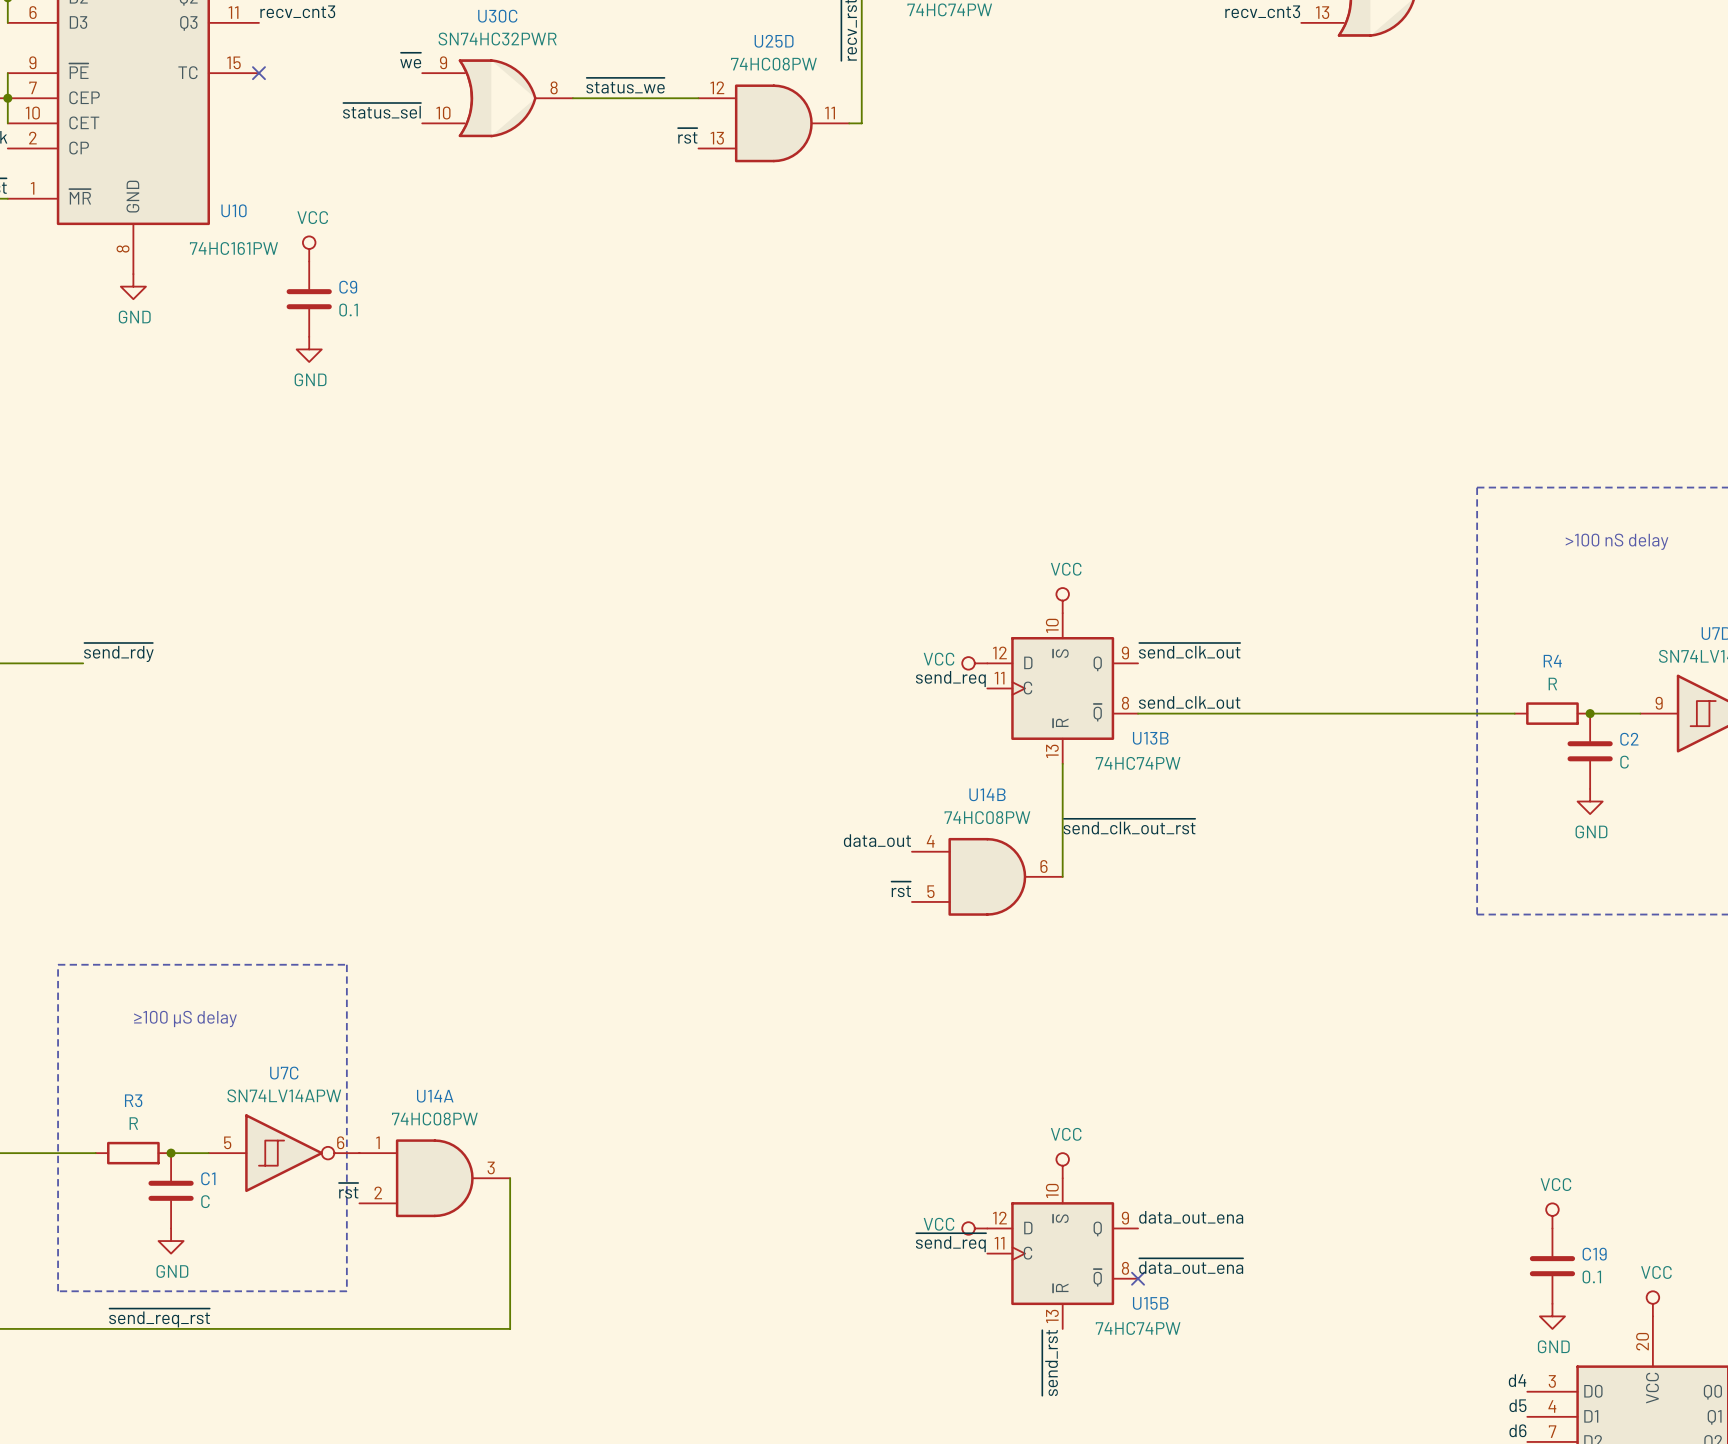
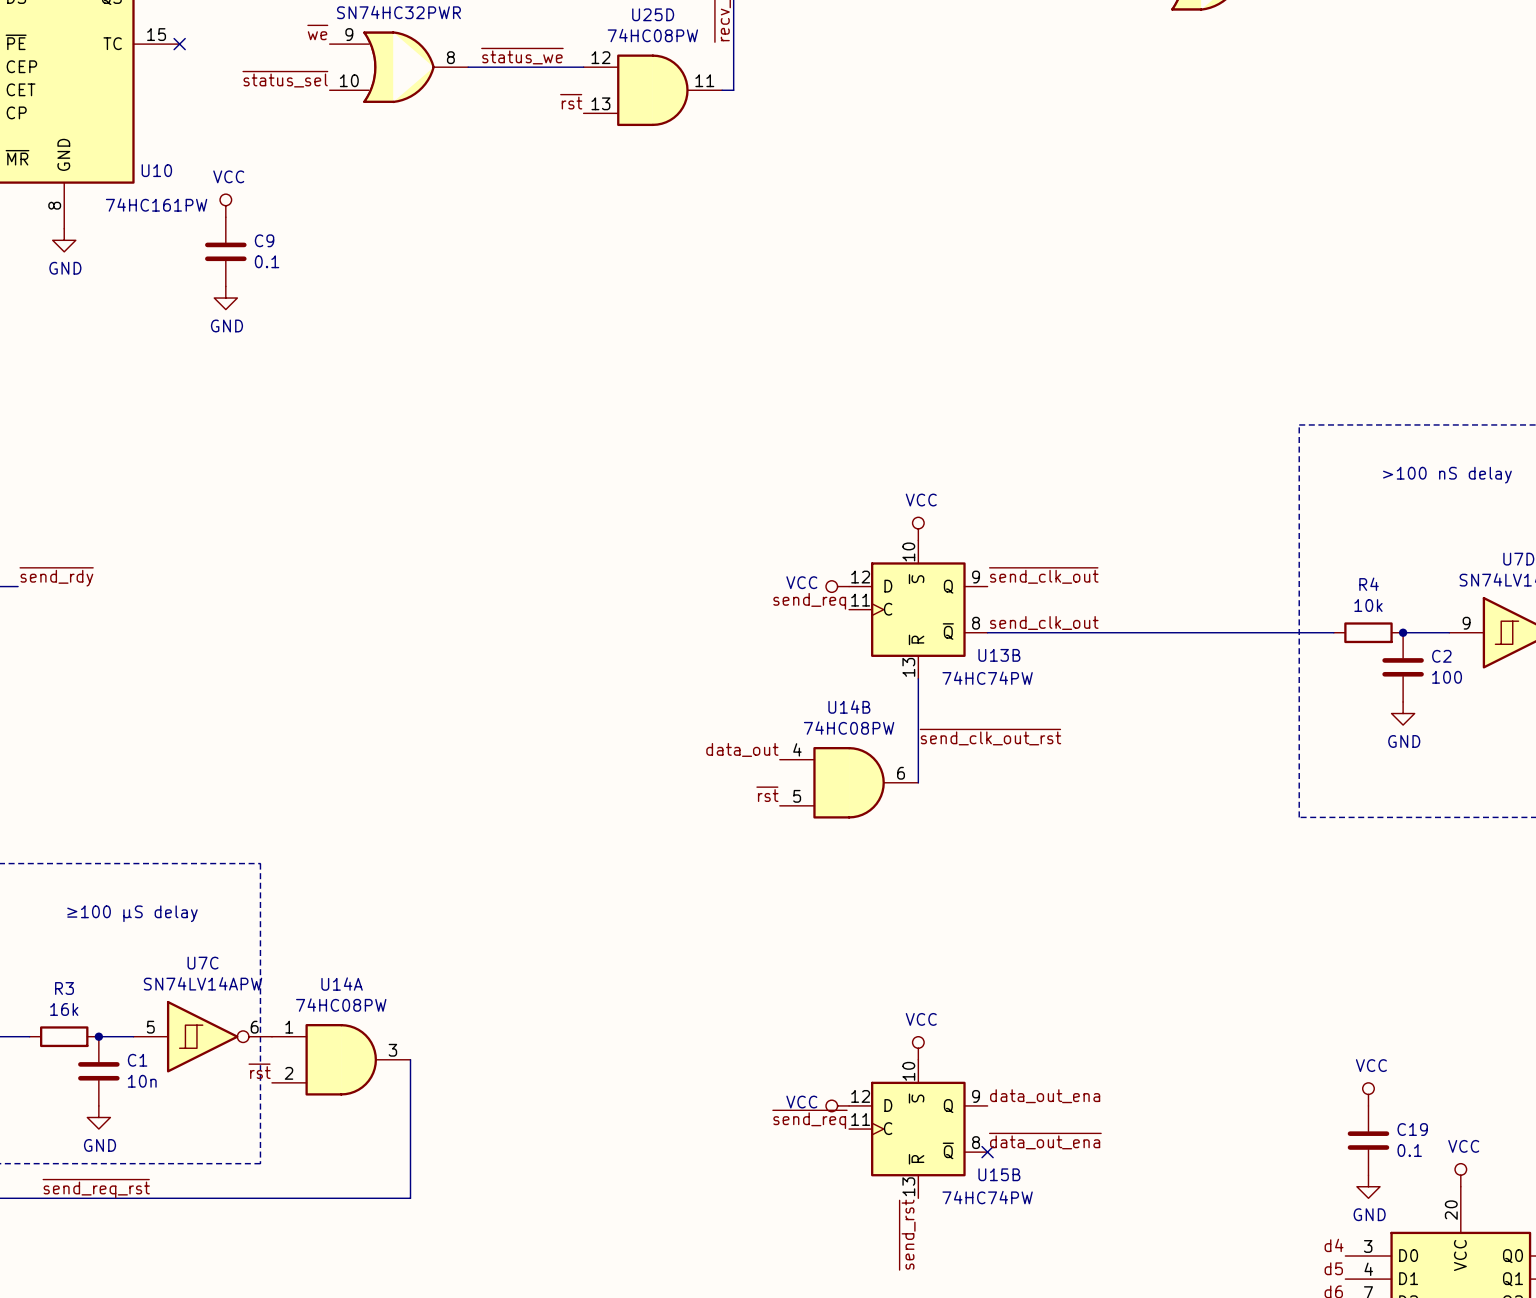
R4 value: R (1552, 684) -> 10k (1368, 605)
C2 value: C (1624, 762) -> 100 (1447, 677)
R3 value: R (133, 1123) -> 16k (64, 1009)
C1 value: C (205, 1201) -> 10n (142, 1081)

